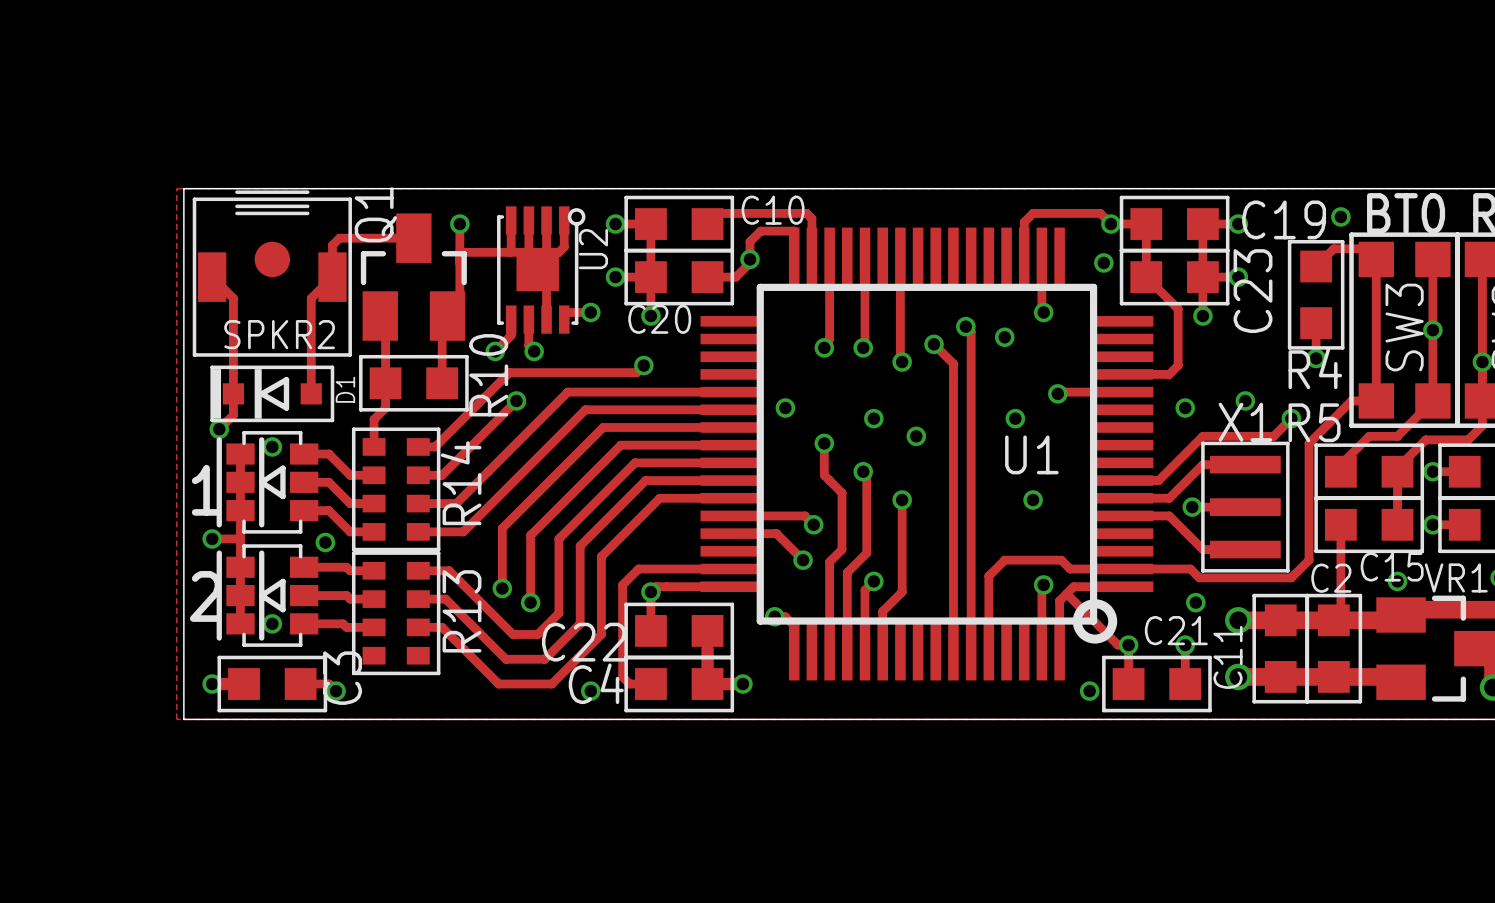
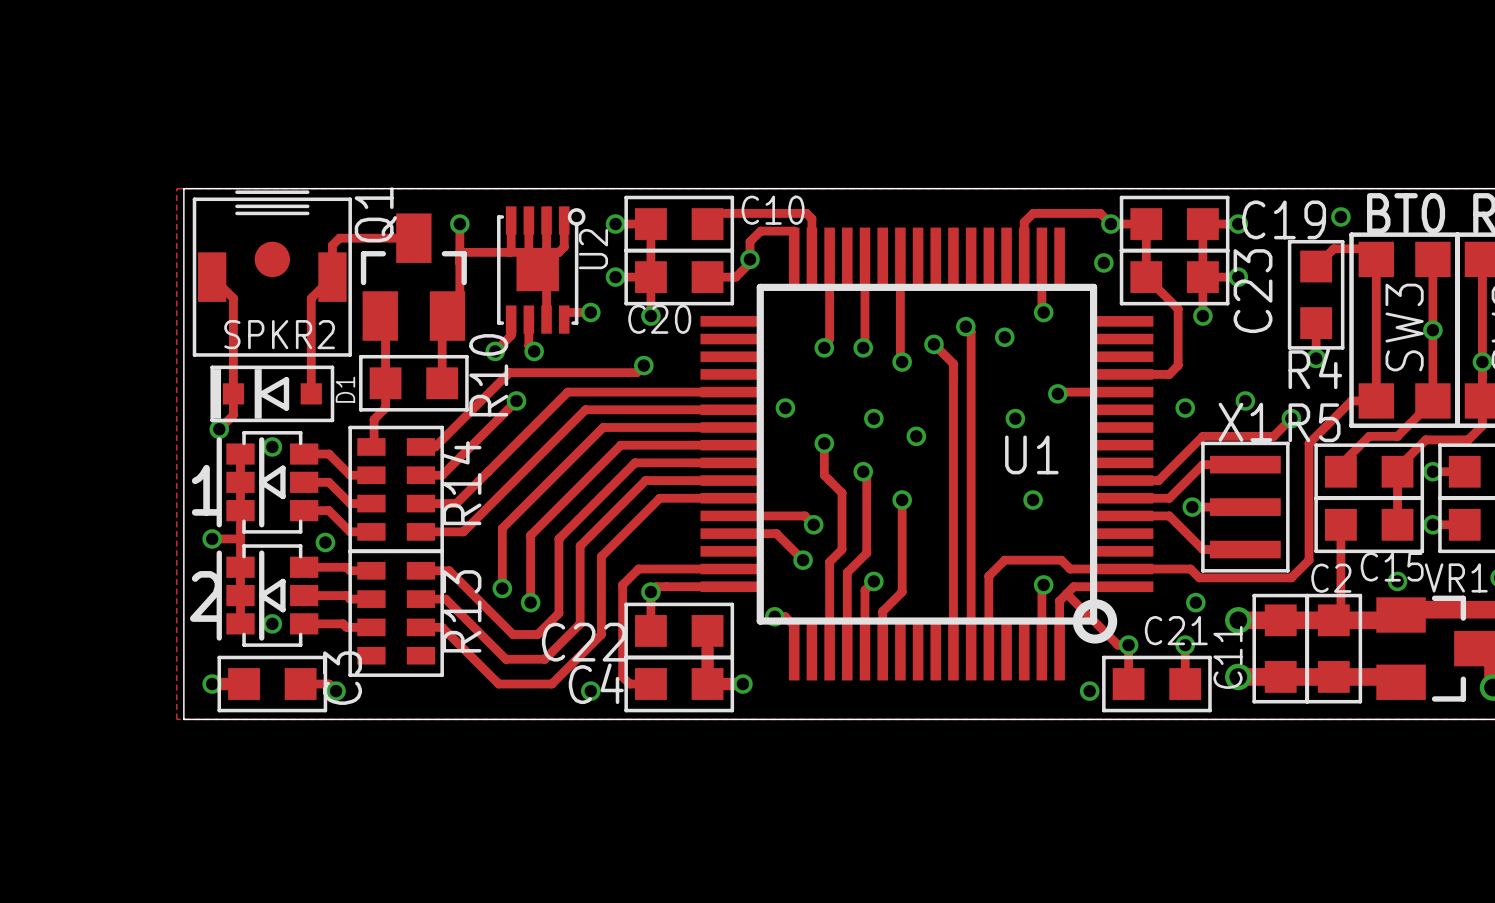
R14 footprint: [351, 427, 441, 552] -> [348, 425, 444, 554]
R13 footprint: [351, 551, 441, 676] -> [348, 549, 444, 677]

